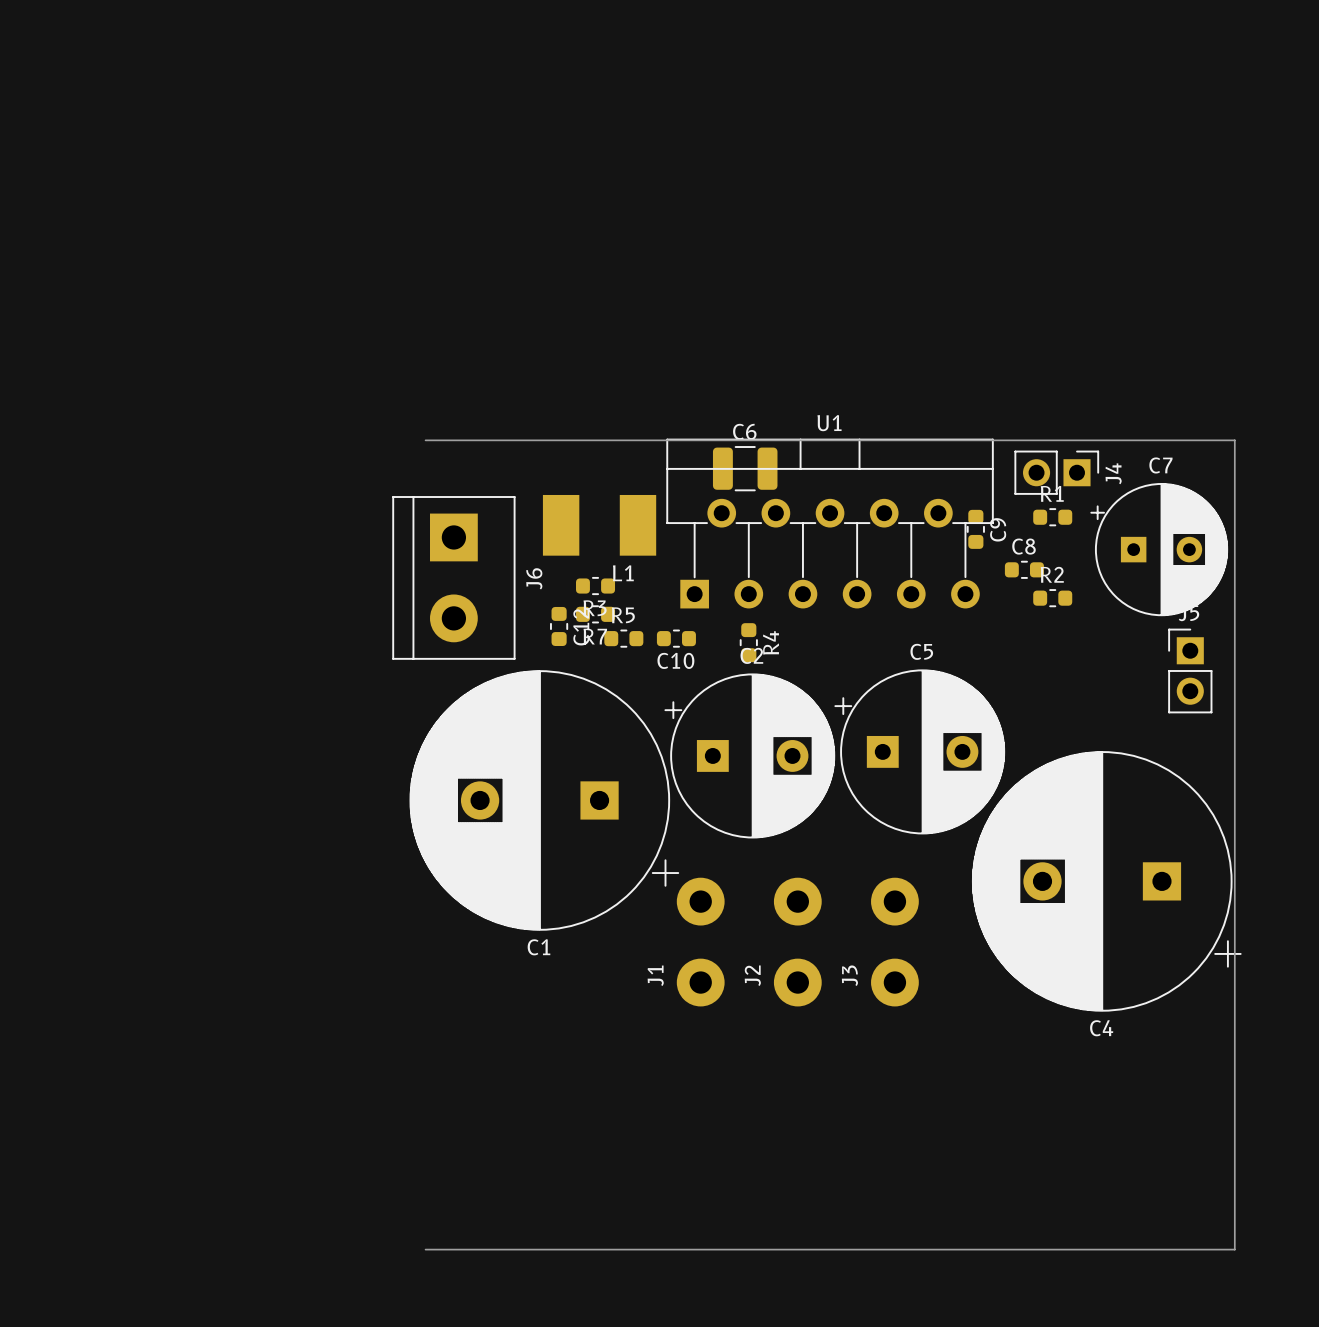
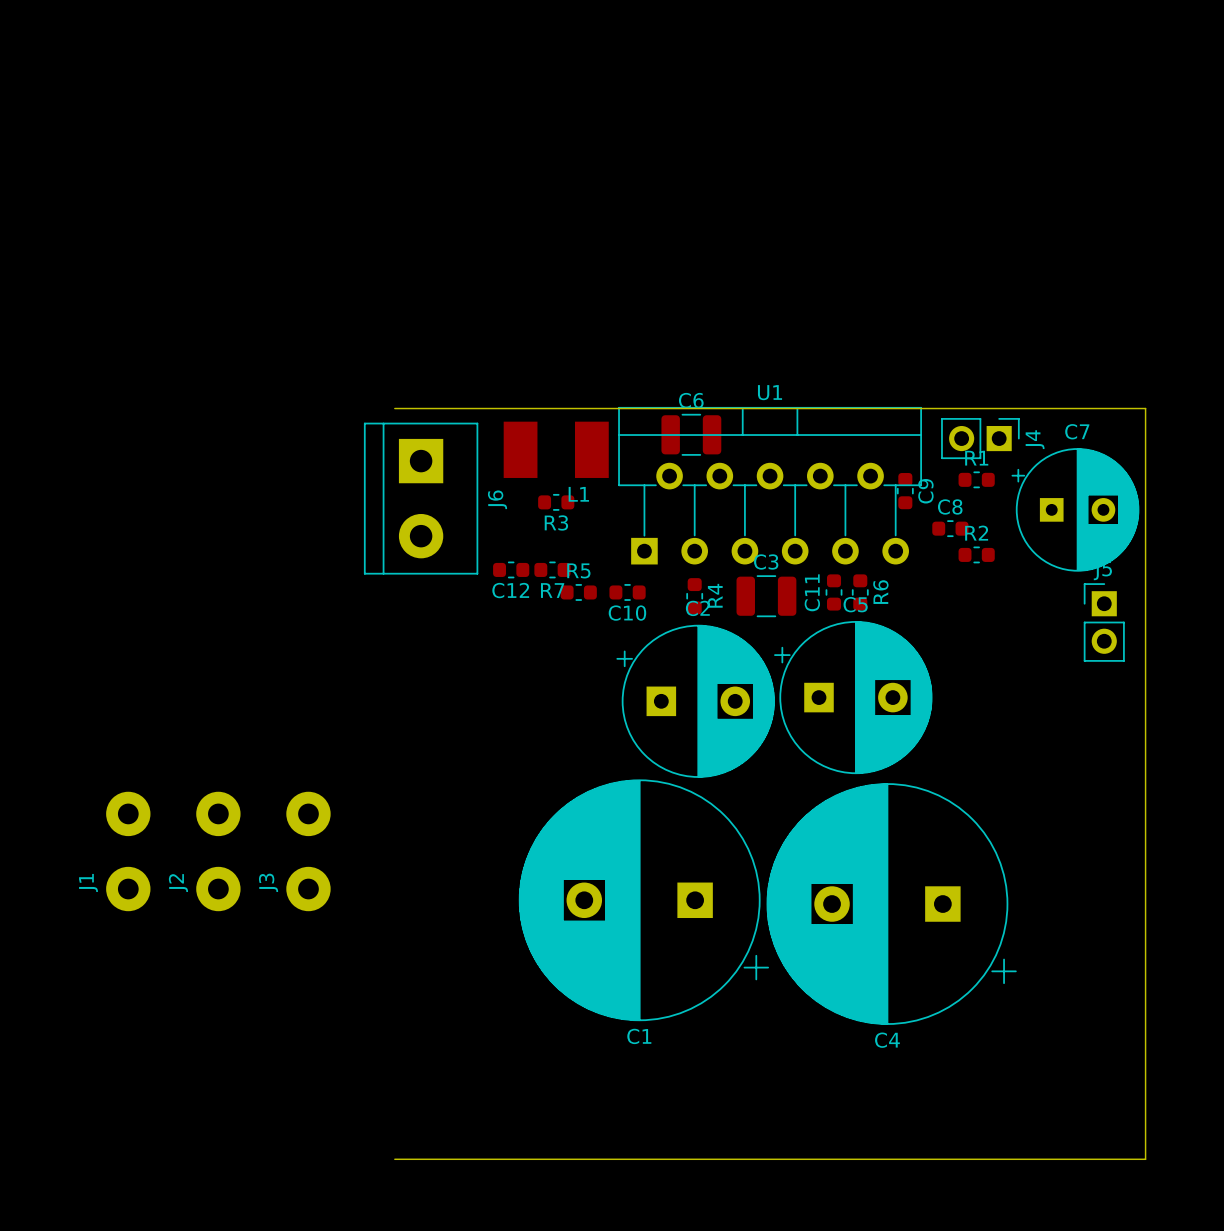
L1 position: (599, 525) -> (556, 449)
J6 position: (453, 577) -> (421, 498)
R3 position: (595, 586) -> (556, 502)
C12 rotation: 0° (559, 626) -> 90° clockwise (511, 569)
C11: none -> (834, 592)
R6: none -> (860, 592)
C3: none -> (766, 596)
C1 position: (544, 800) -> (643, 900)
C4 position: (1106, 881) -> (891, 904)
J1 position: (700, 942) -> (128, 851)
J2 position: (797, 942) -> (218, 851)
J3 position: (894, 942) -> (308, 851)

